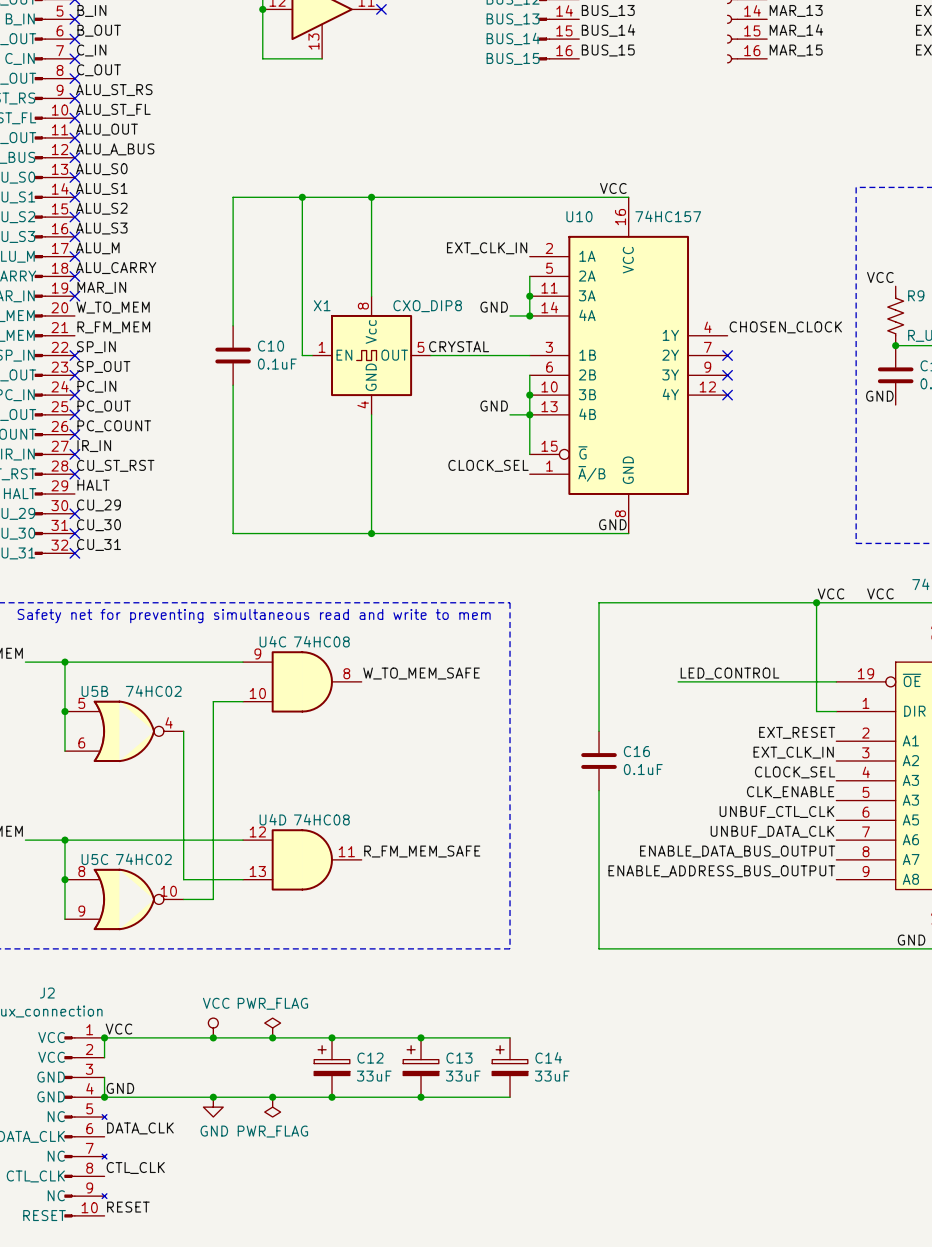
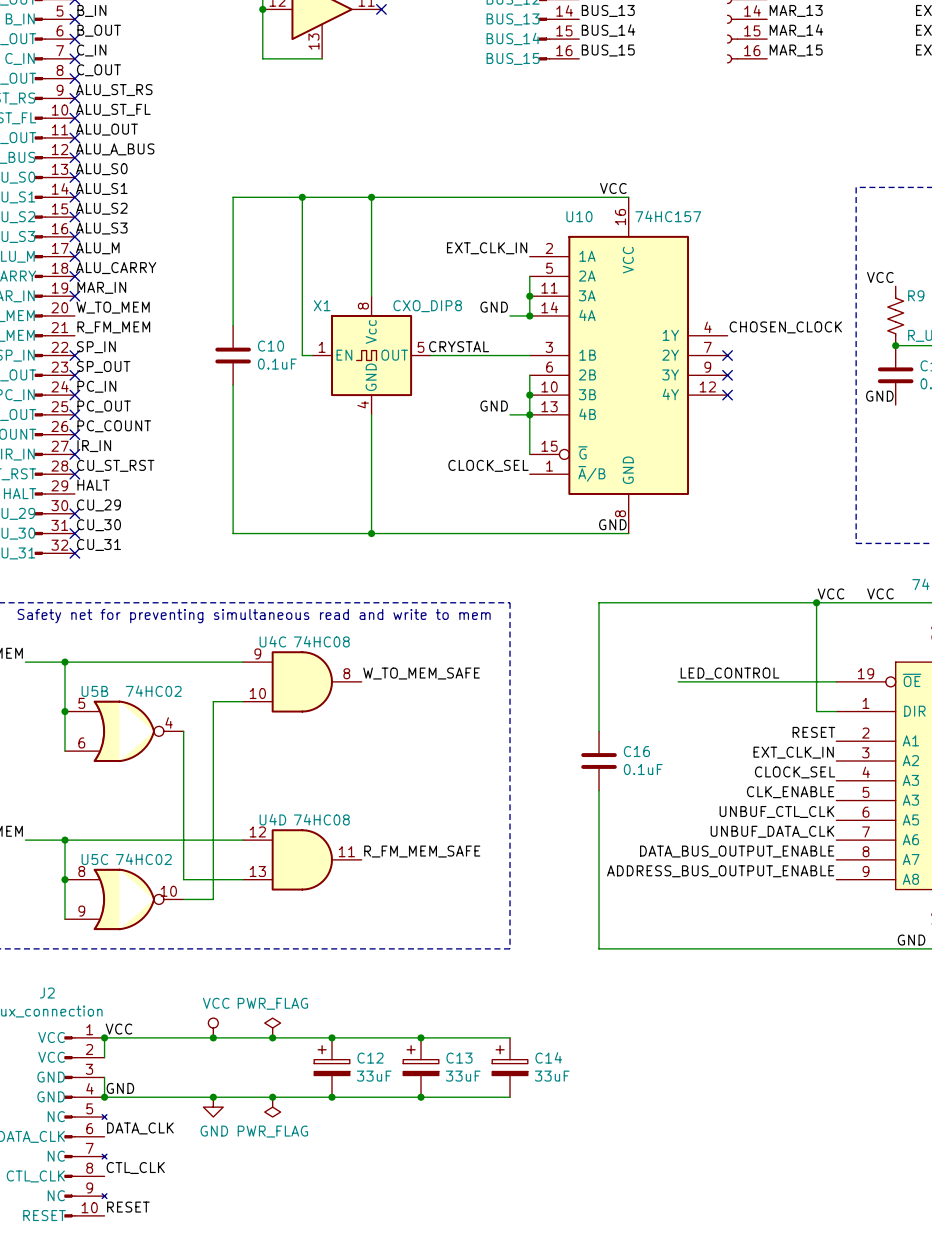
label: EXT_RESET (797, 732) -> RESET (813, 732)
label: ENABLE_DATA_BUS_OUTPUT (737, 851) -> DATA_BUS_OUTPUT_ENABLE (737, 851)
label: ENABLE_ADDRESS_BUS_OUTPUT (721, 871) -> ADDRESS_BUS_OUTPUT_ENABLE (720, 871)

